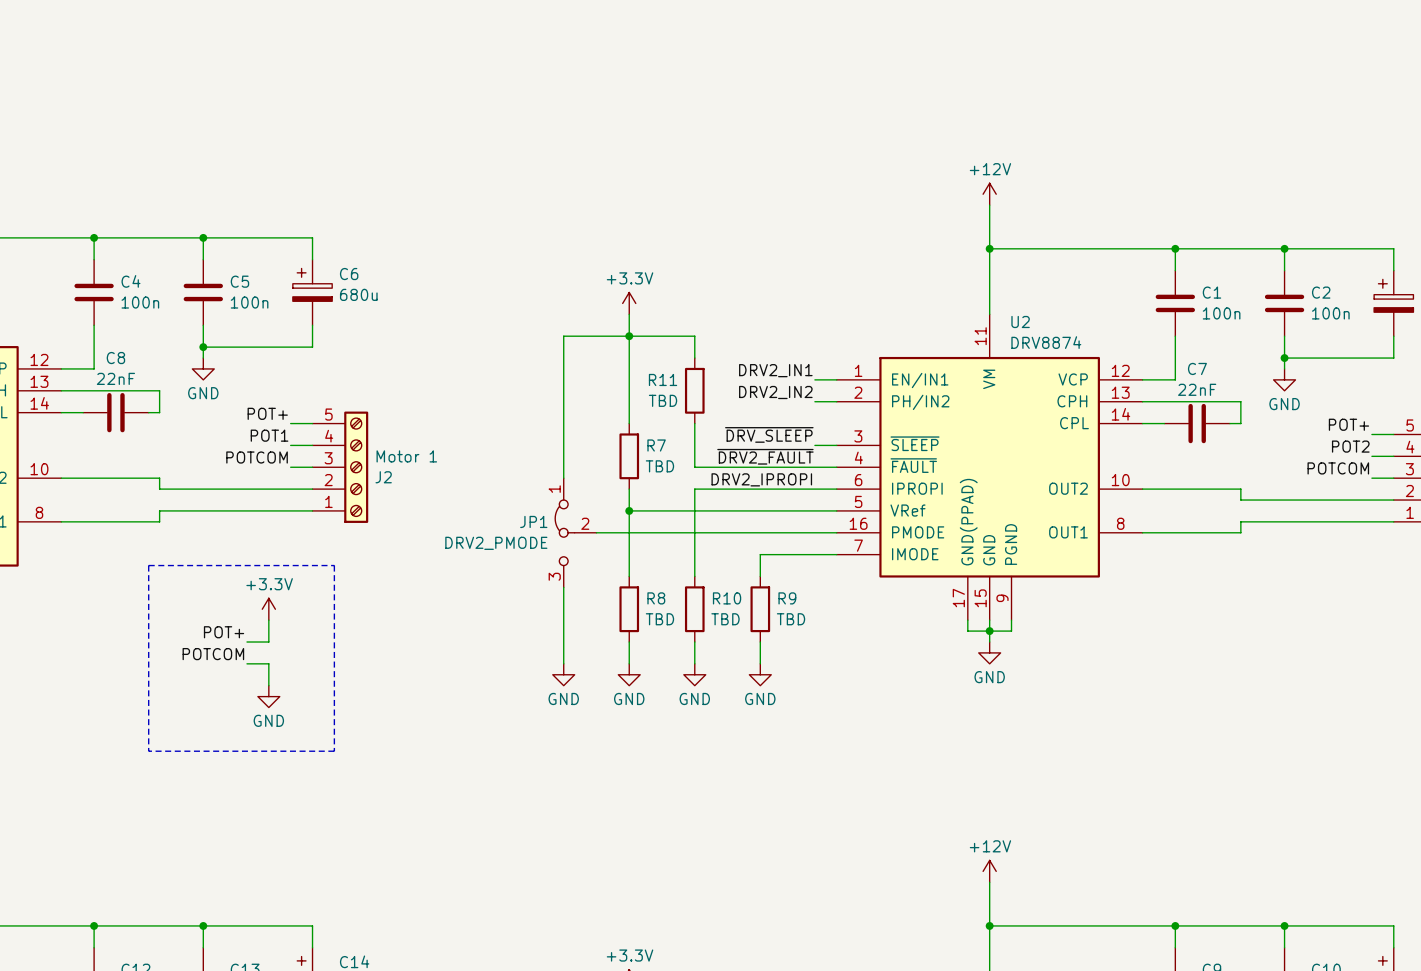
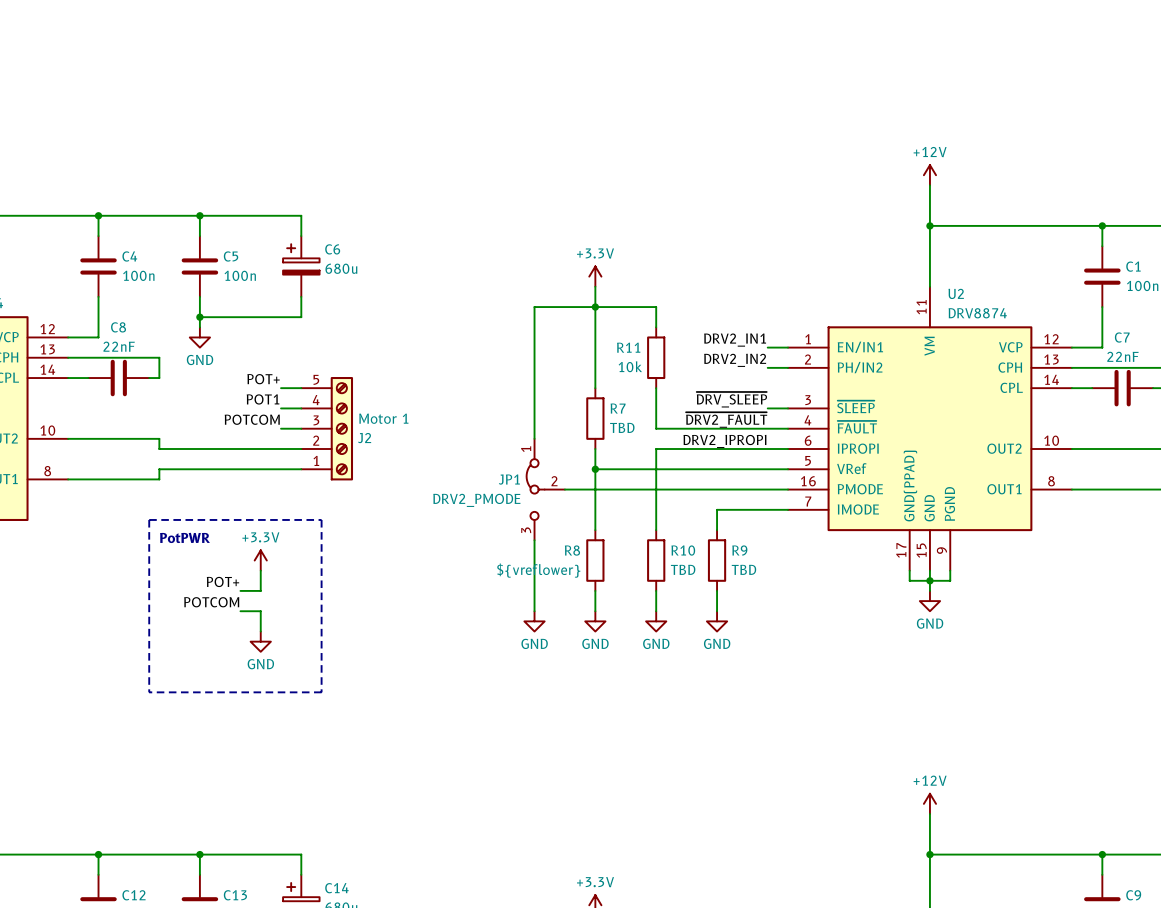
R11 value: TBD (663, 400) -> 10k (630, 366)
text: none -> PotPWR (184, 537)
R8 name position: R8 (656, 598) -> R8 (572, 550)
R8 value: TBD (659, 619) -> ${vreflower} (538, 570)

